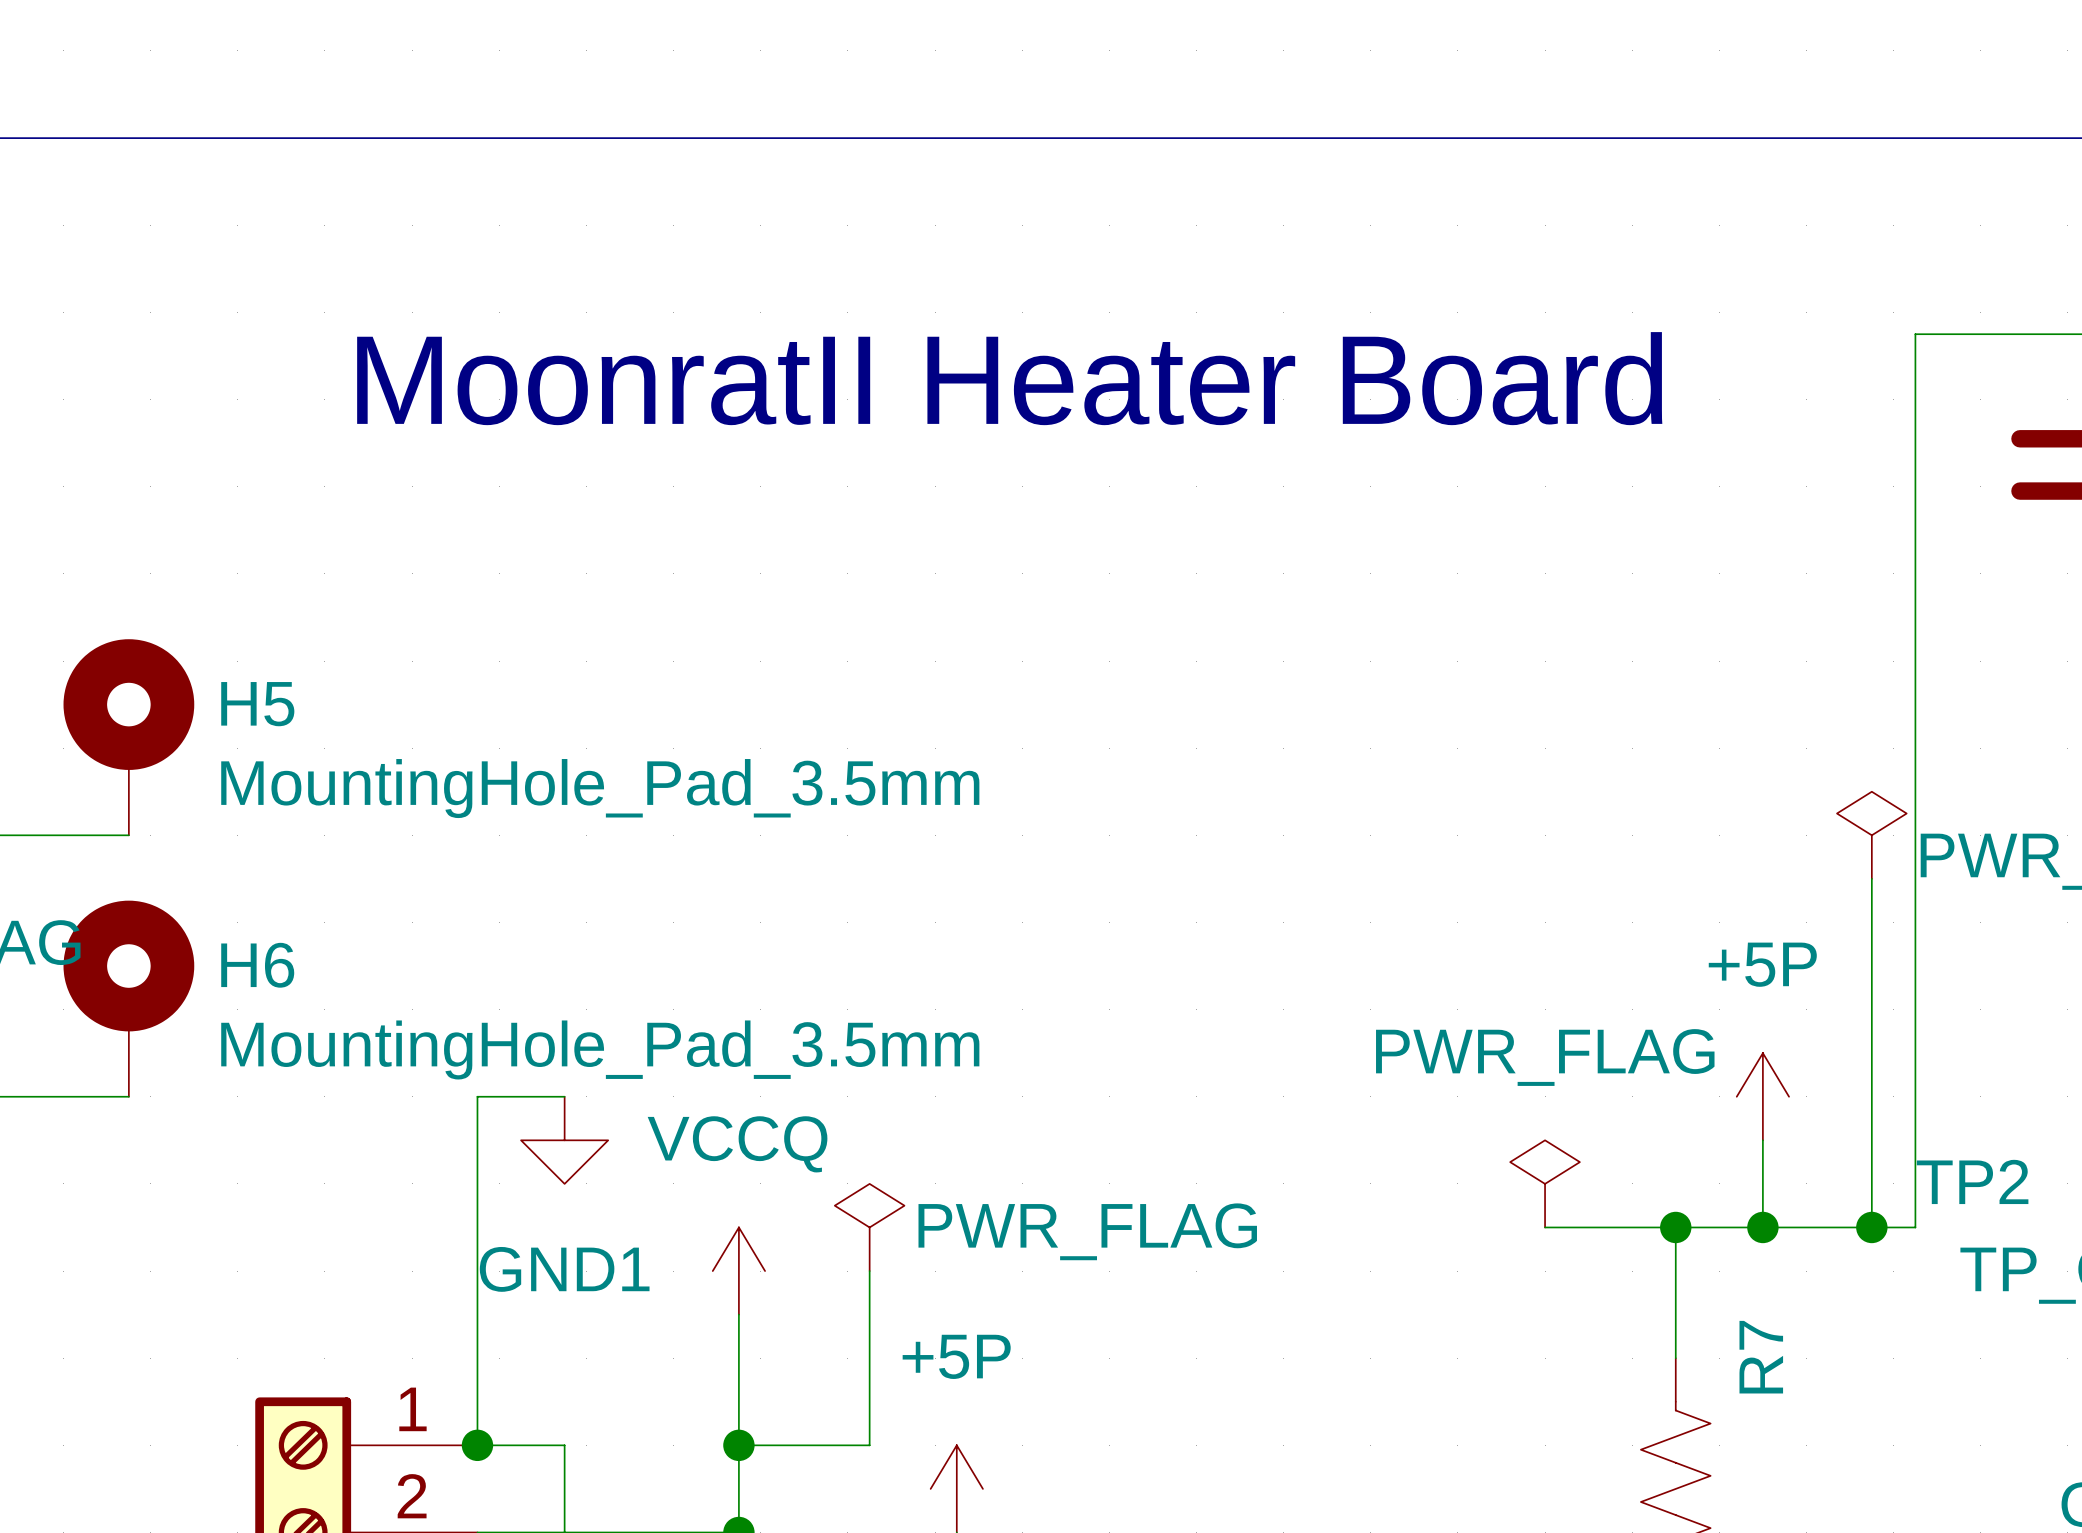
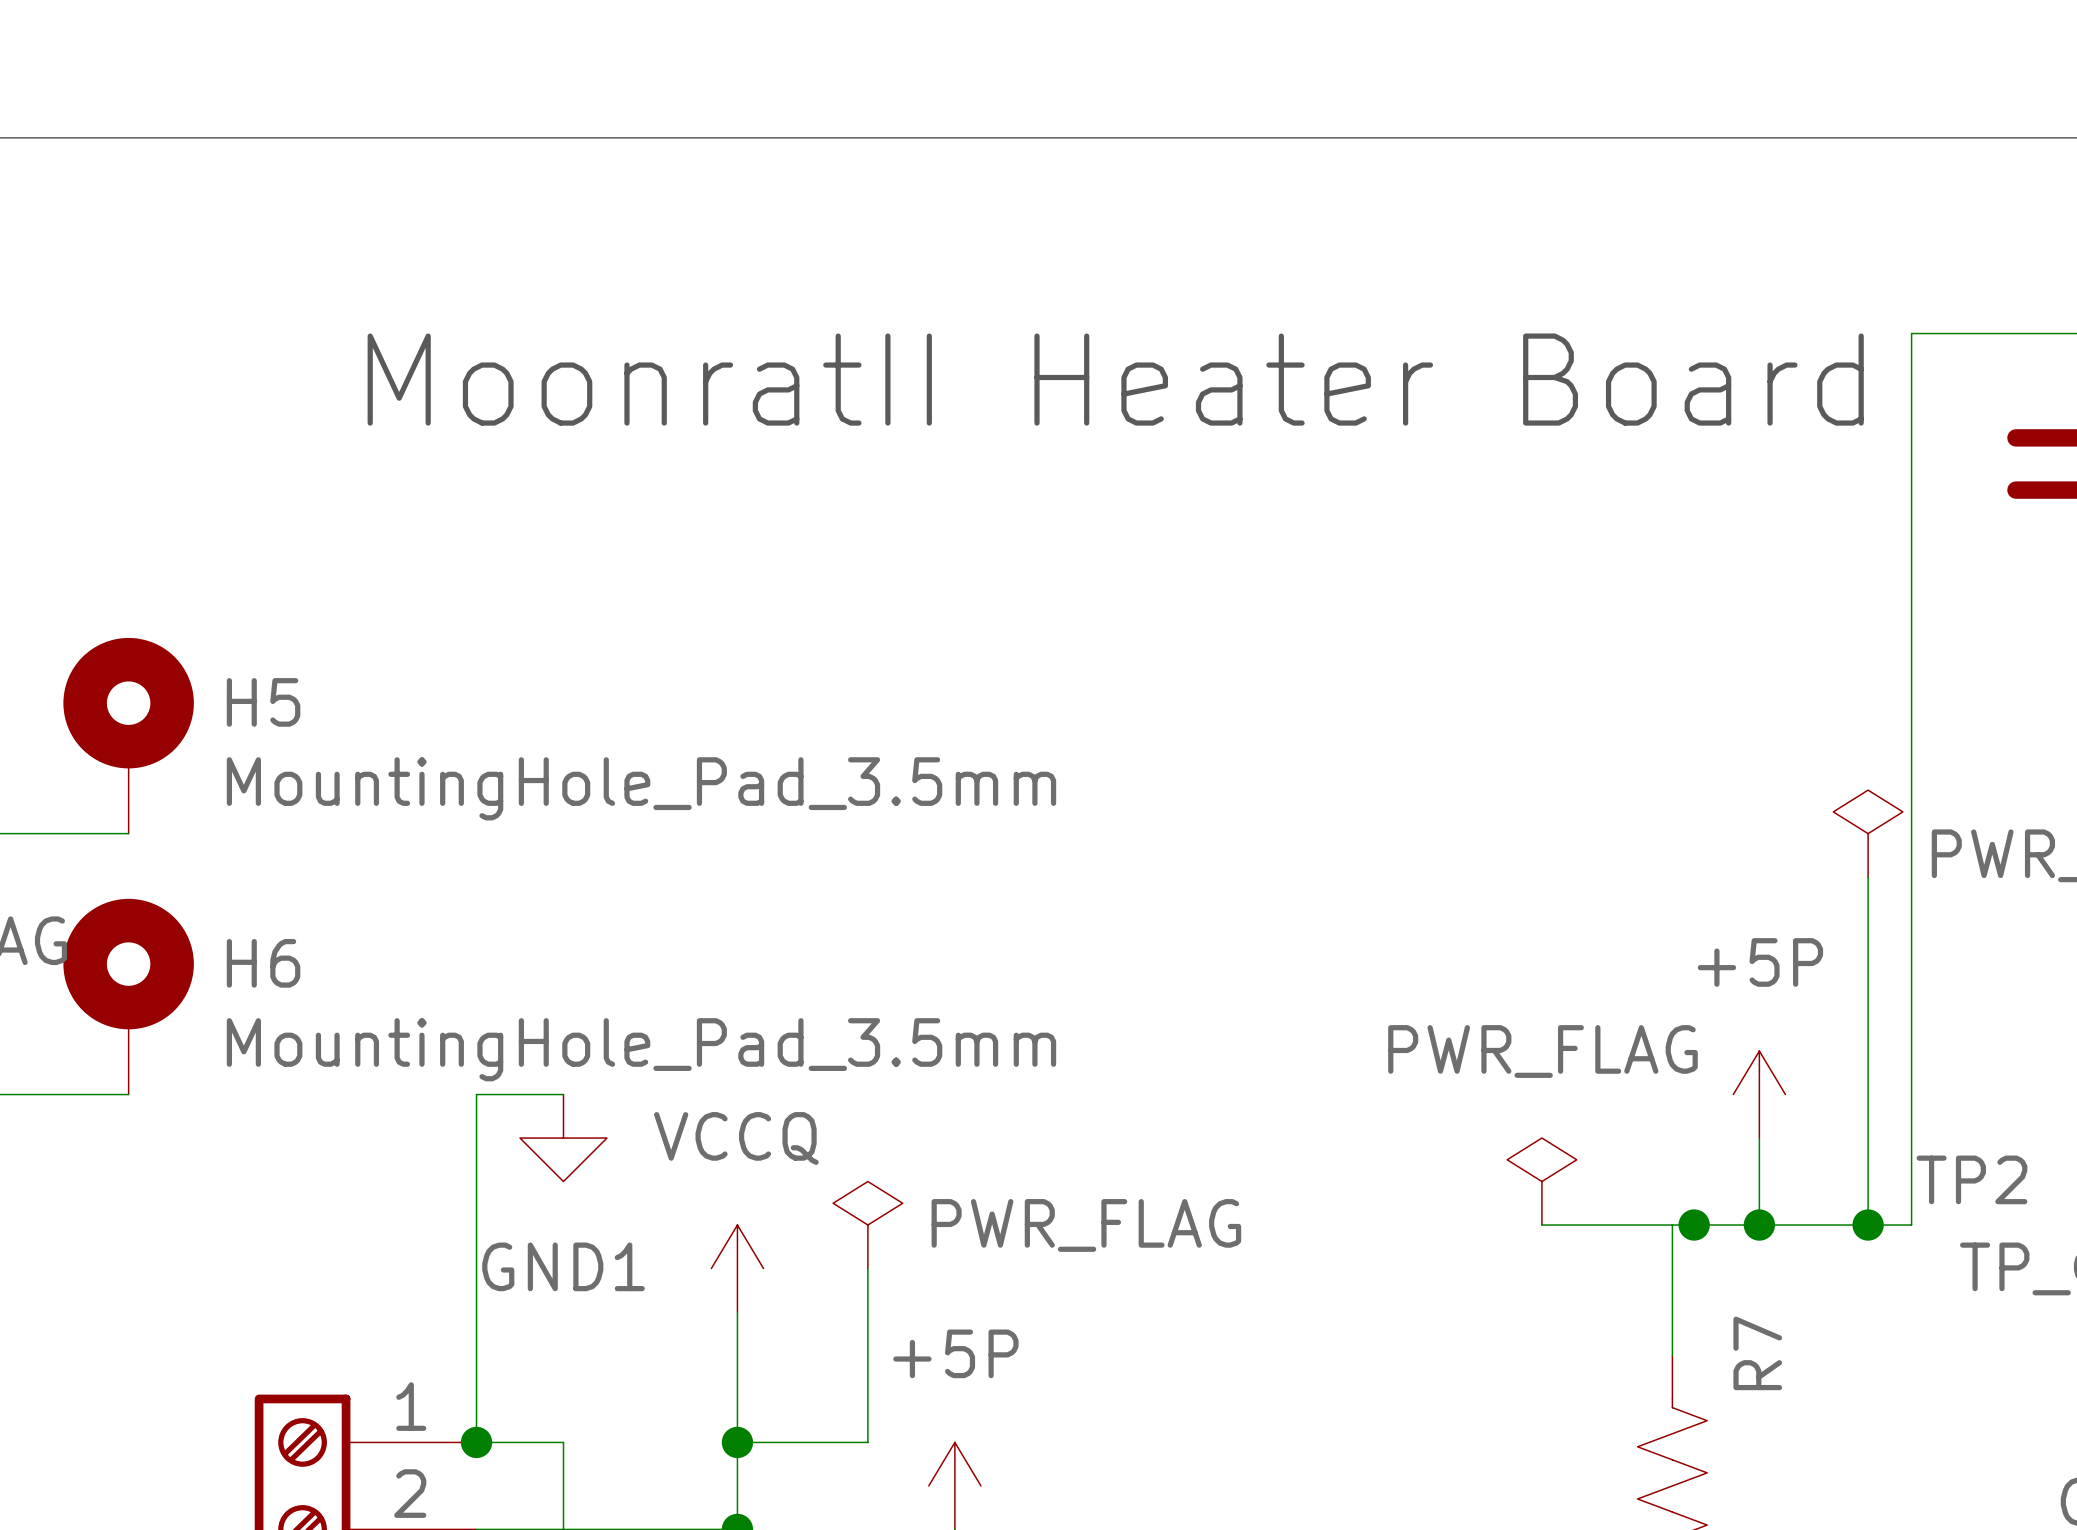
junction position: (1675, 1227) -> (1694, 1225)

